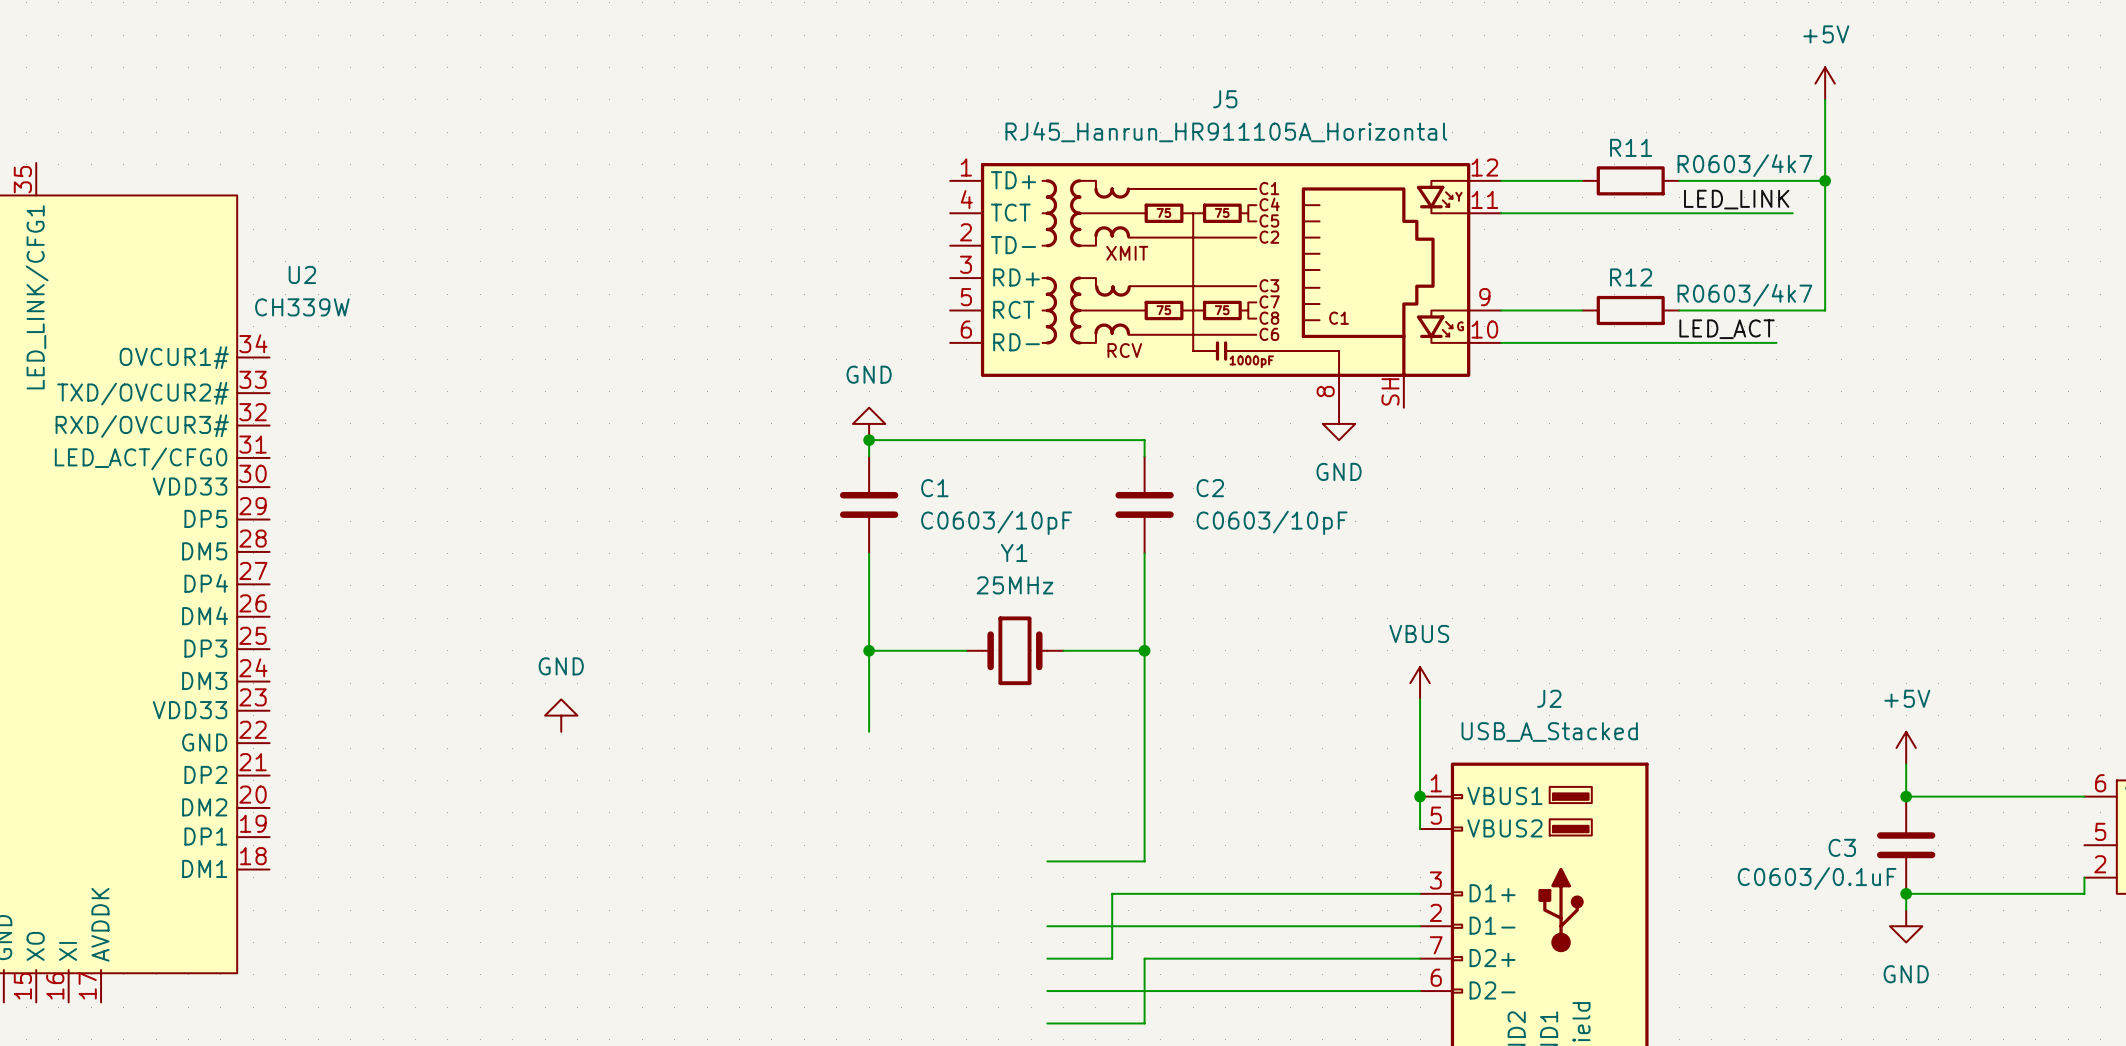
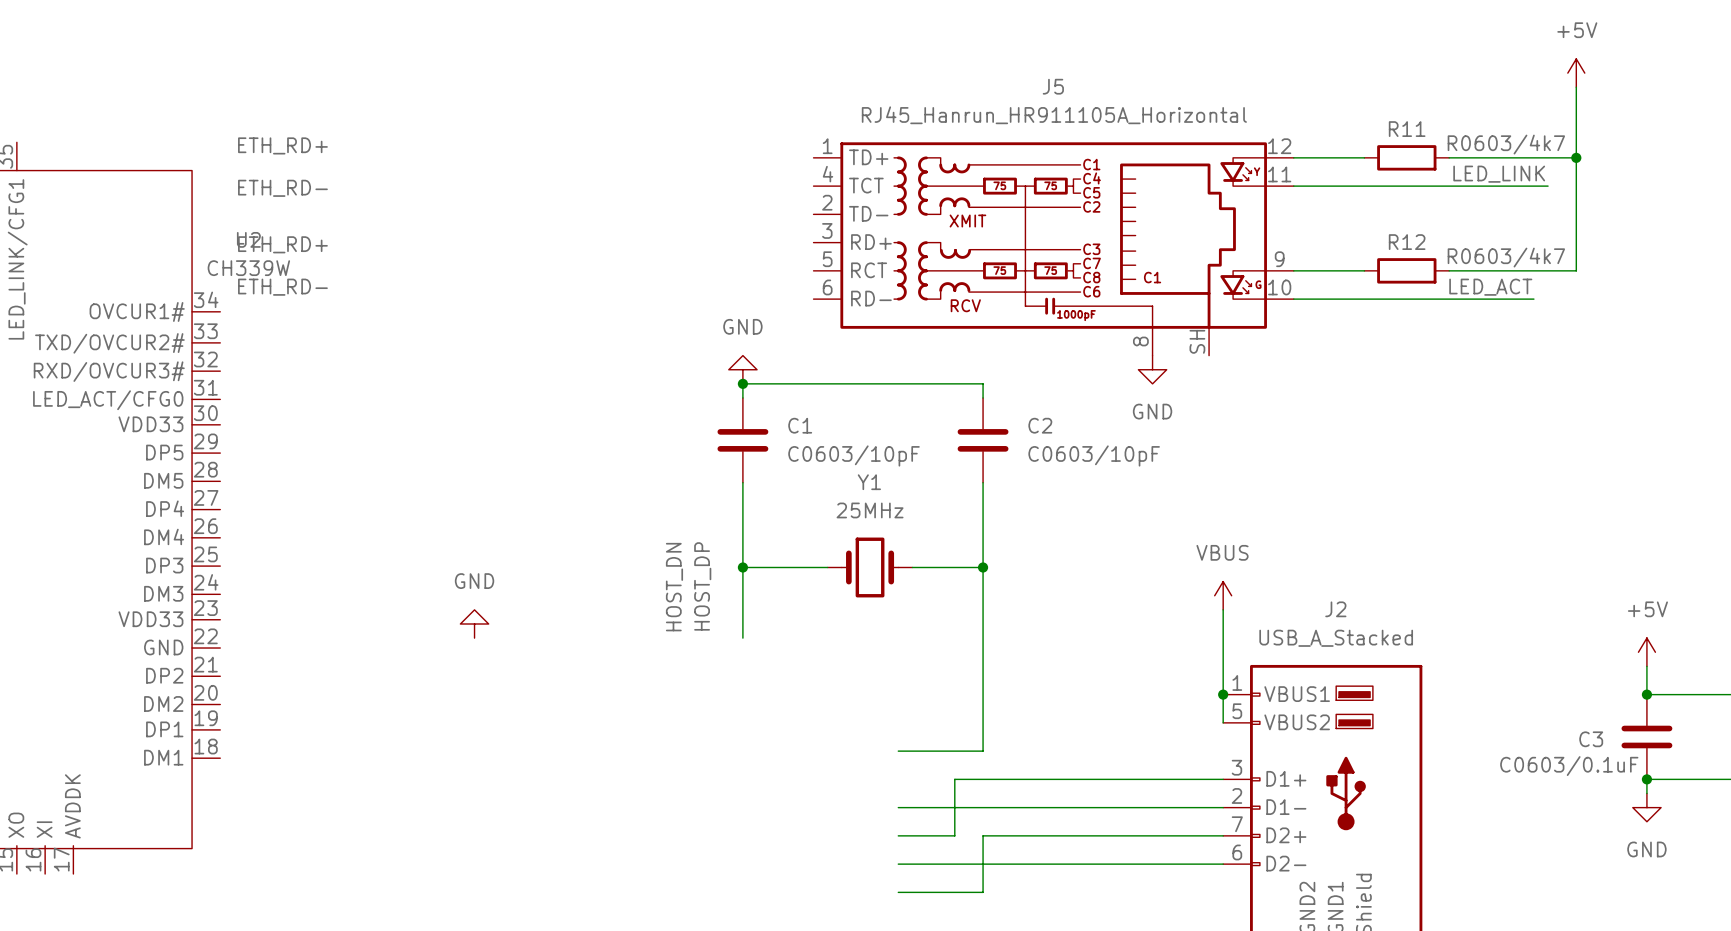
label: none -> ETH_RD+ (282, 145)
label: none -> ETH_RD- (282, 188)
label: none -> ETH_RD+ (282, 244)
label: none -> ETH_RD- (282, 287)
label: none -> HOST_DP (702, 586)
label: none -> HOST_DN (674, 587)

